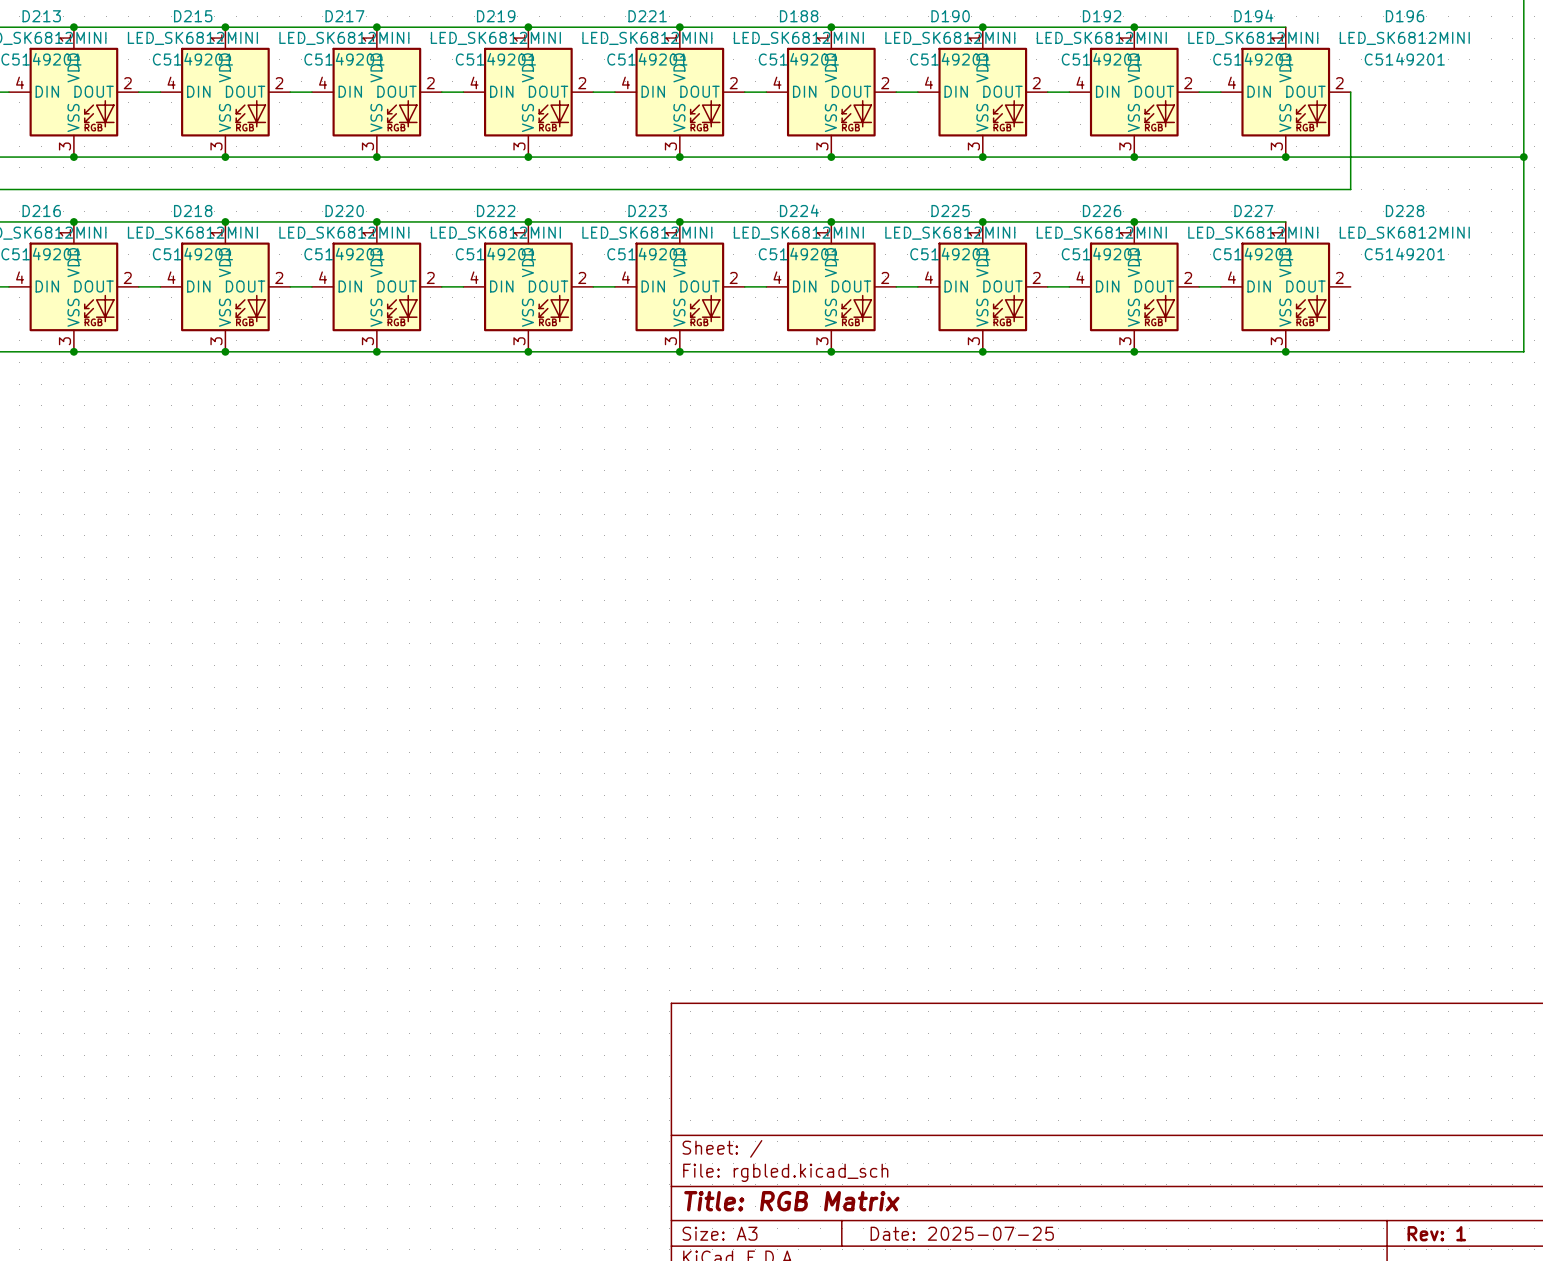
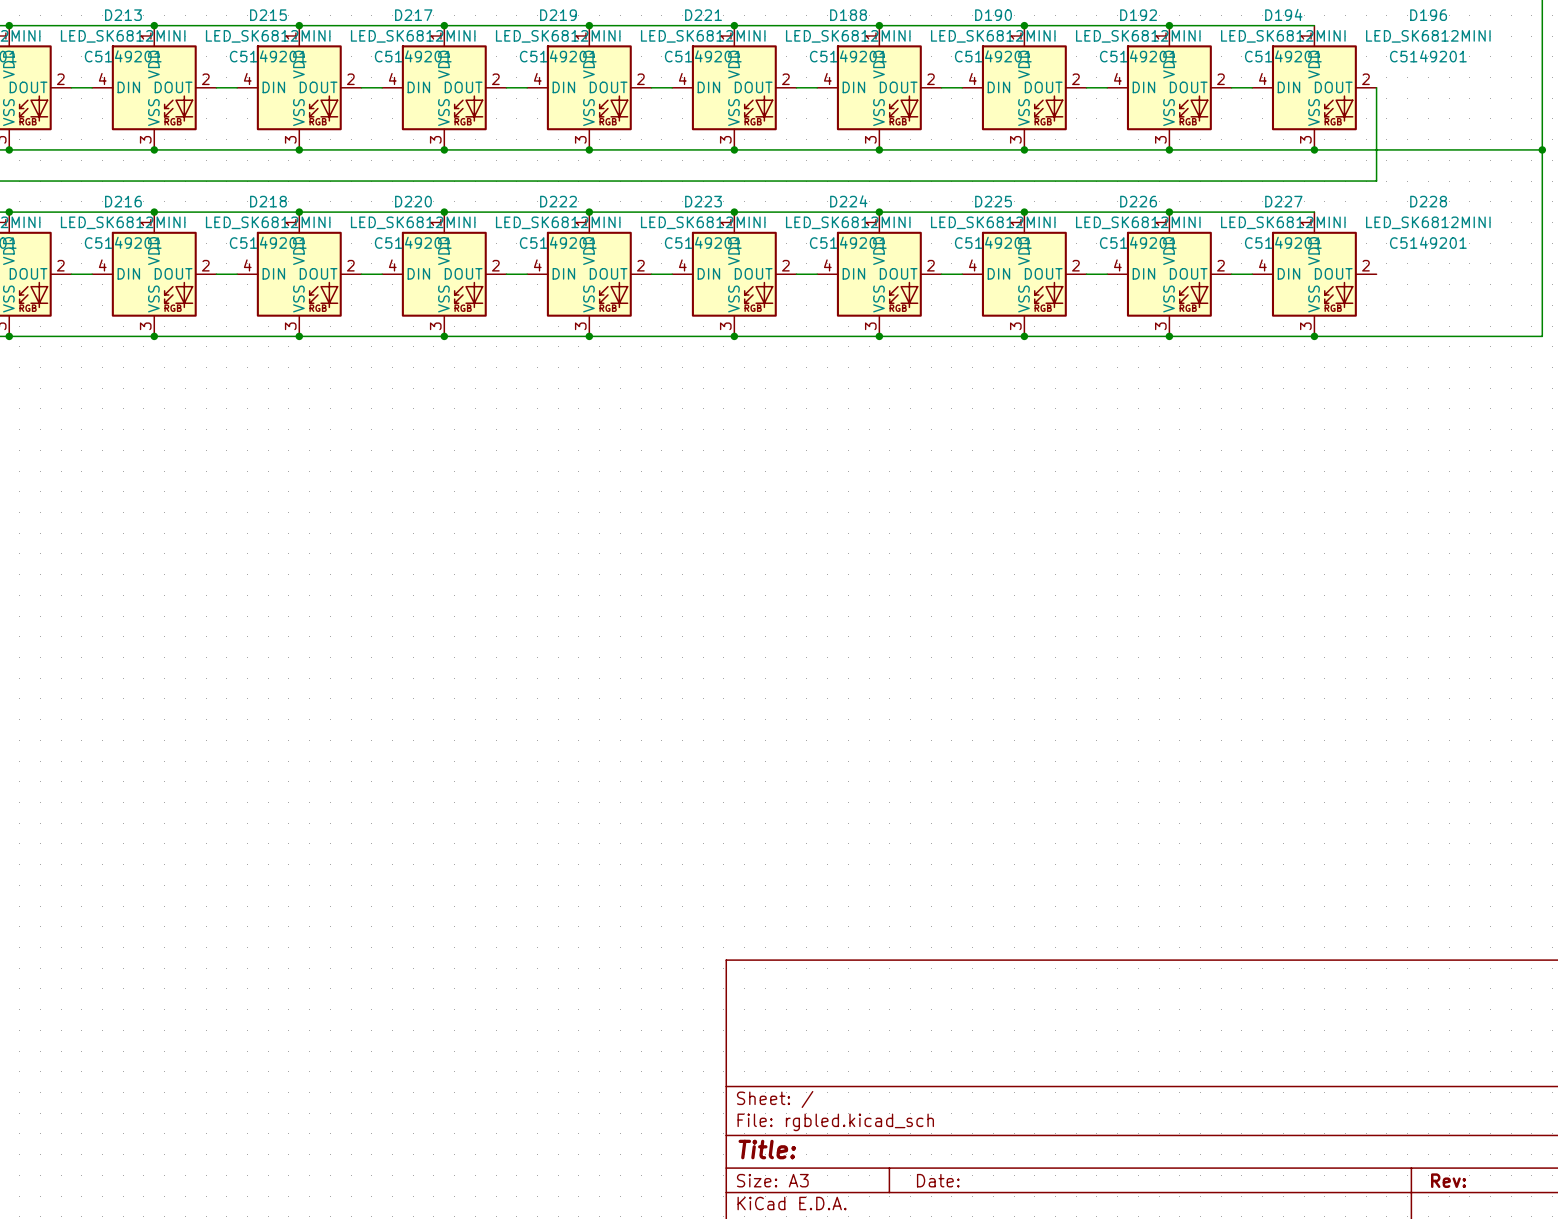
title block: Title: RGB Matrix (791, 1201) -> Title: (767, 1149)
title block: Date: 2025-07-25 (962, 1233) -> Date: (938, 1180)
title block: Rev: 1 (1436, 1233) -> Rev: (1448, 1180)

